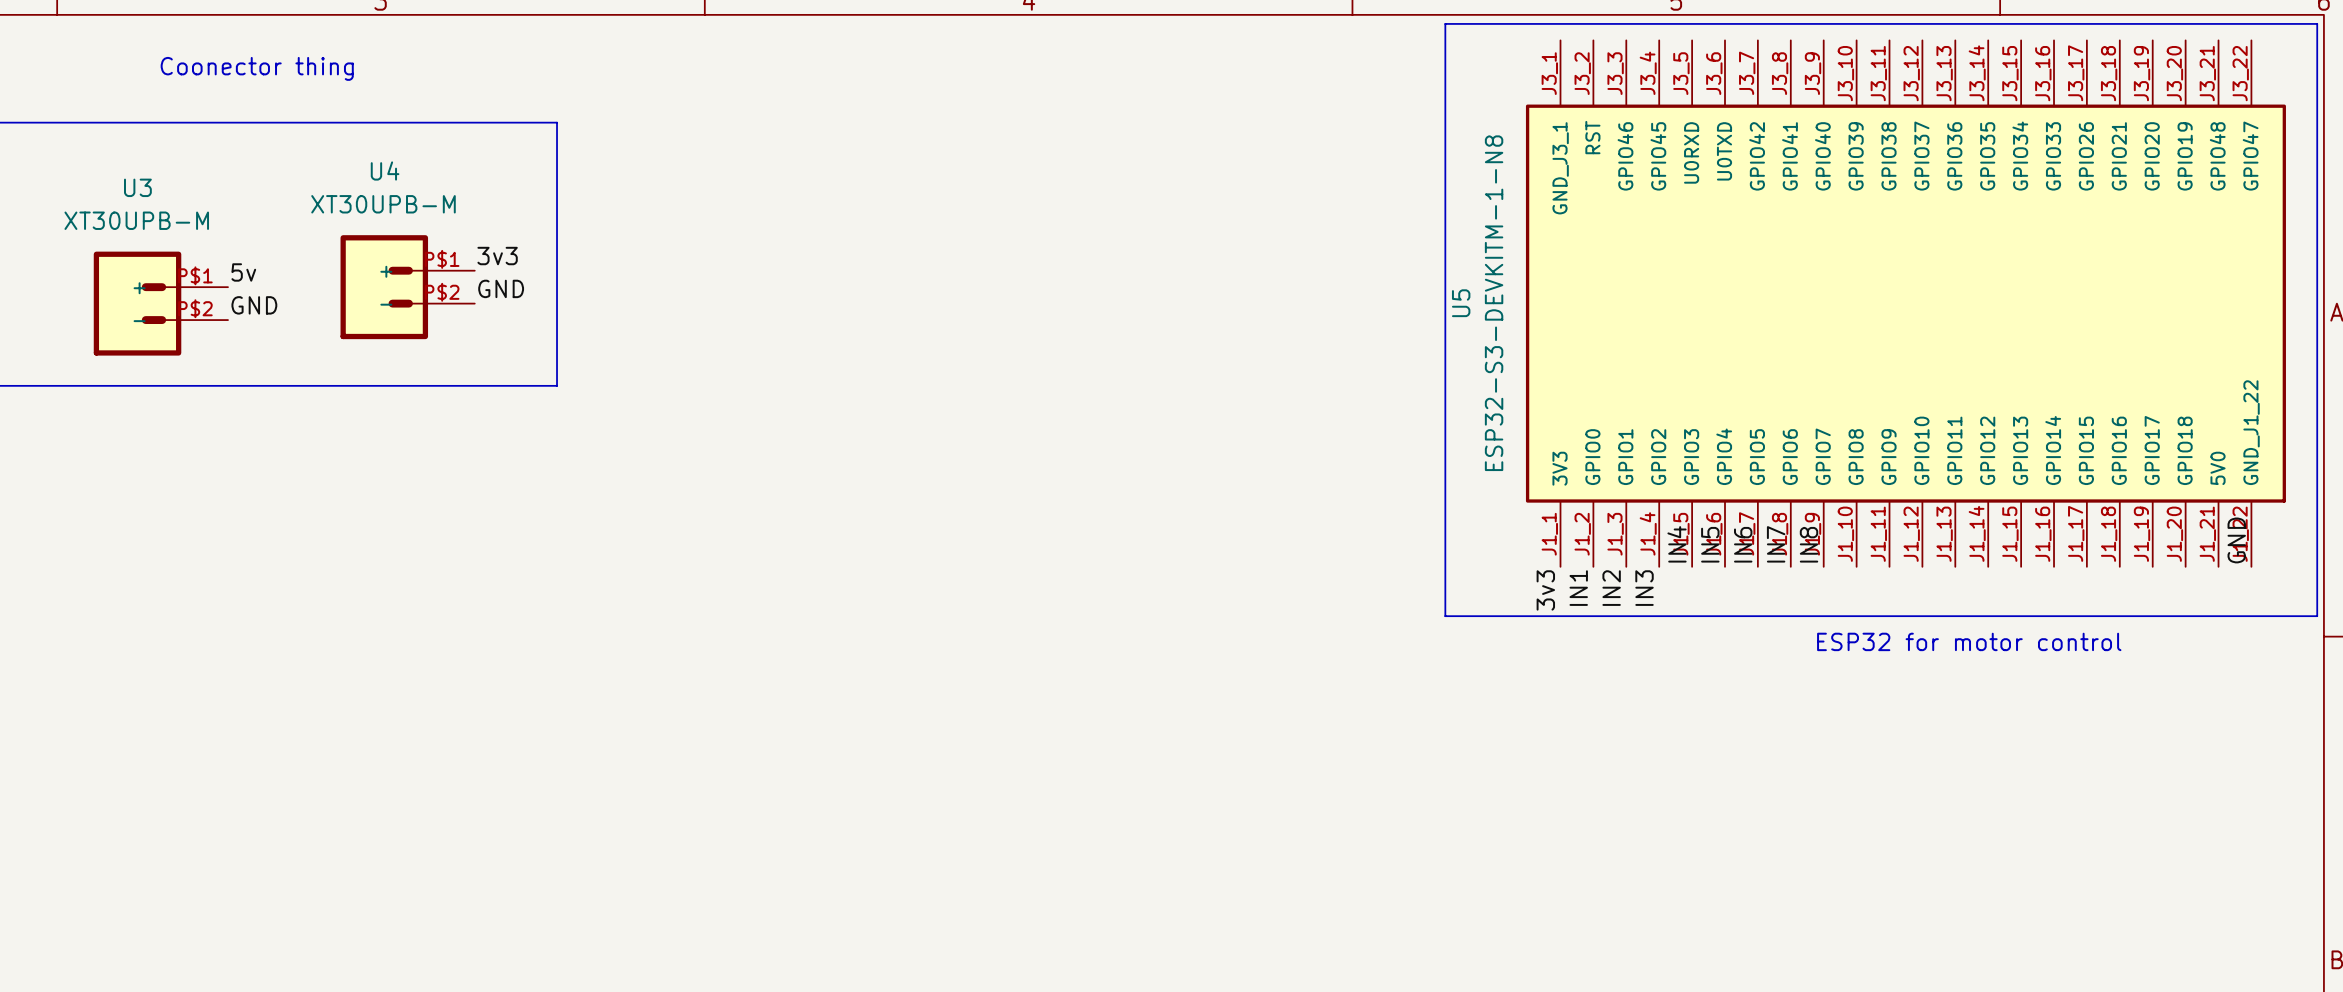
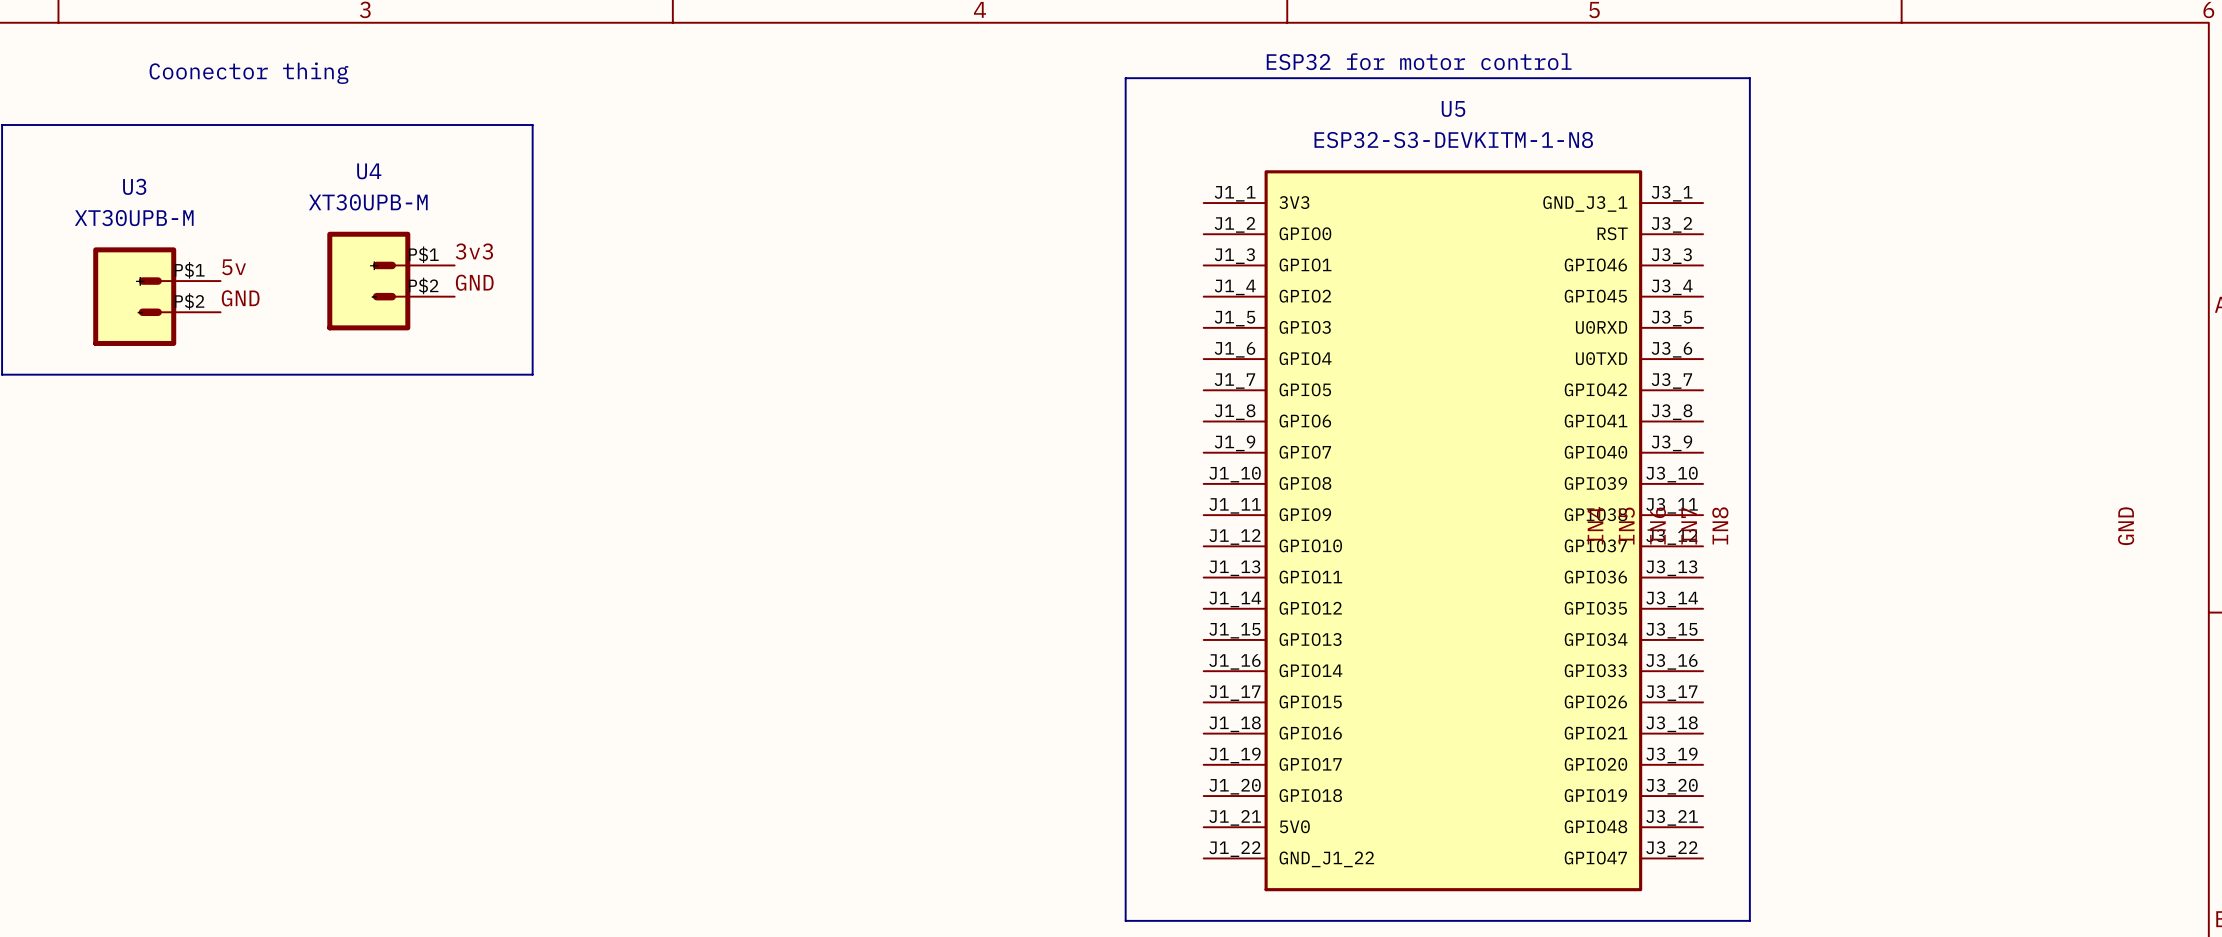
line: (1445, 23) (2317, 23) (2317, 616) (1445, 616) (1445, 23) -> none
text: none -> ESP32 for motor control (1419, 61)
line: none -> (1125, 78) (1749, 78) (1749, 920) (1125, 920) (1125, 78)
U5 rotation: 0° (1905, 303) -> 90° clockwise (1453, 530)
label: IN1 (1578, 588) -> none
label: IN2 (1611, 588) -> none
label: IN3 (1644, 588) -> none
label: 3v3 (1545, 590) -> none
text: ESP32 for motor control (1969, 641) -> none

